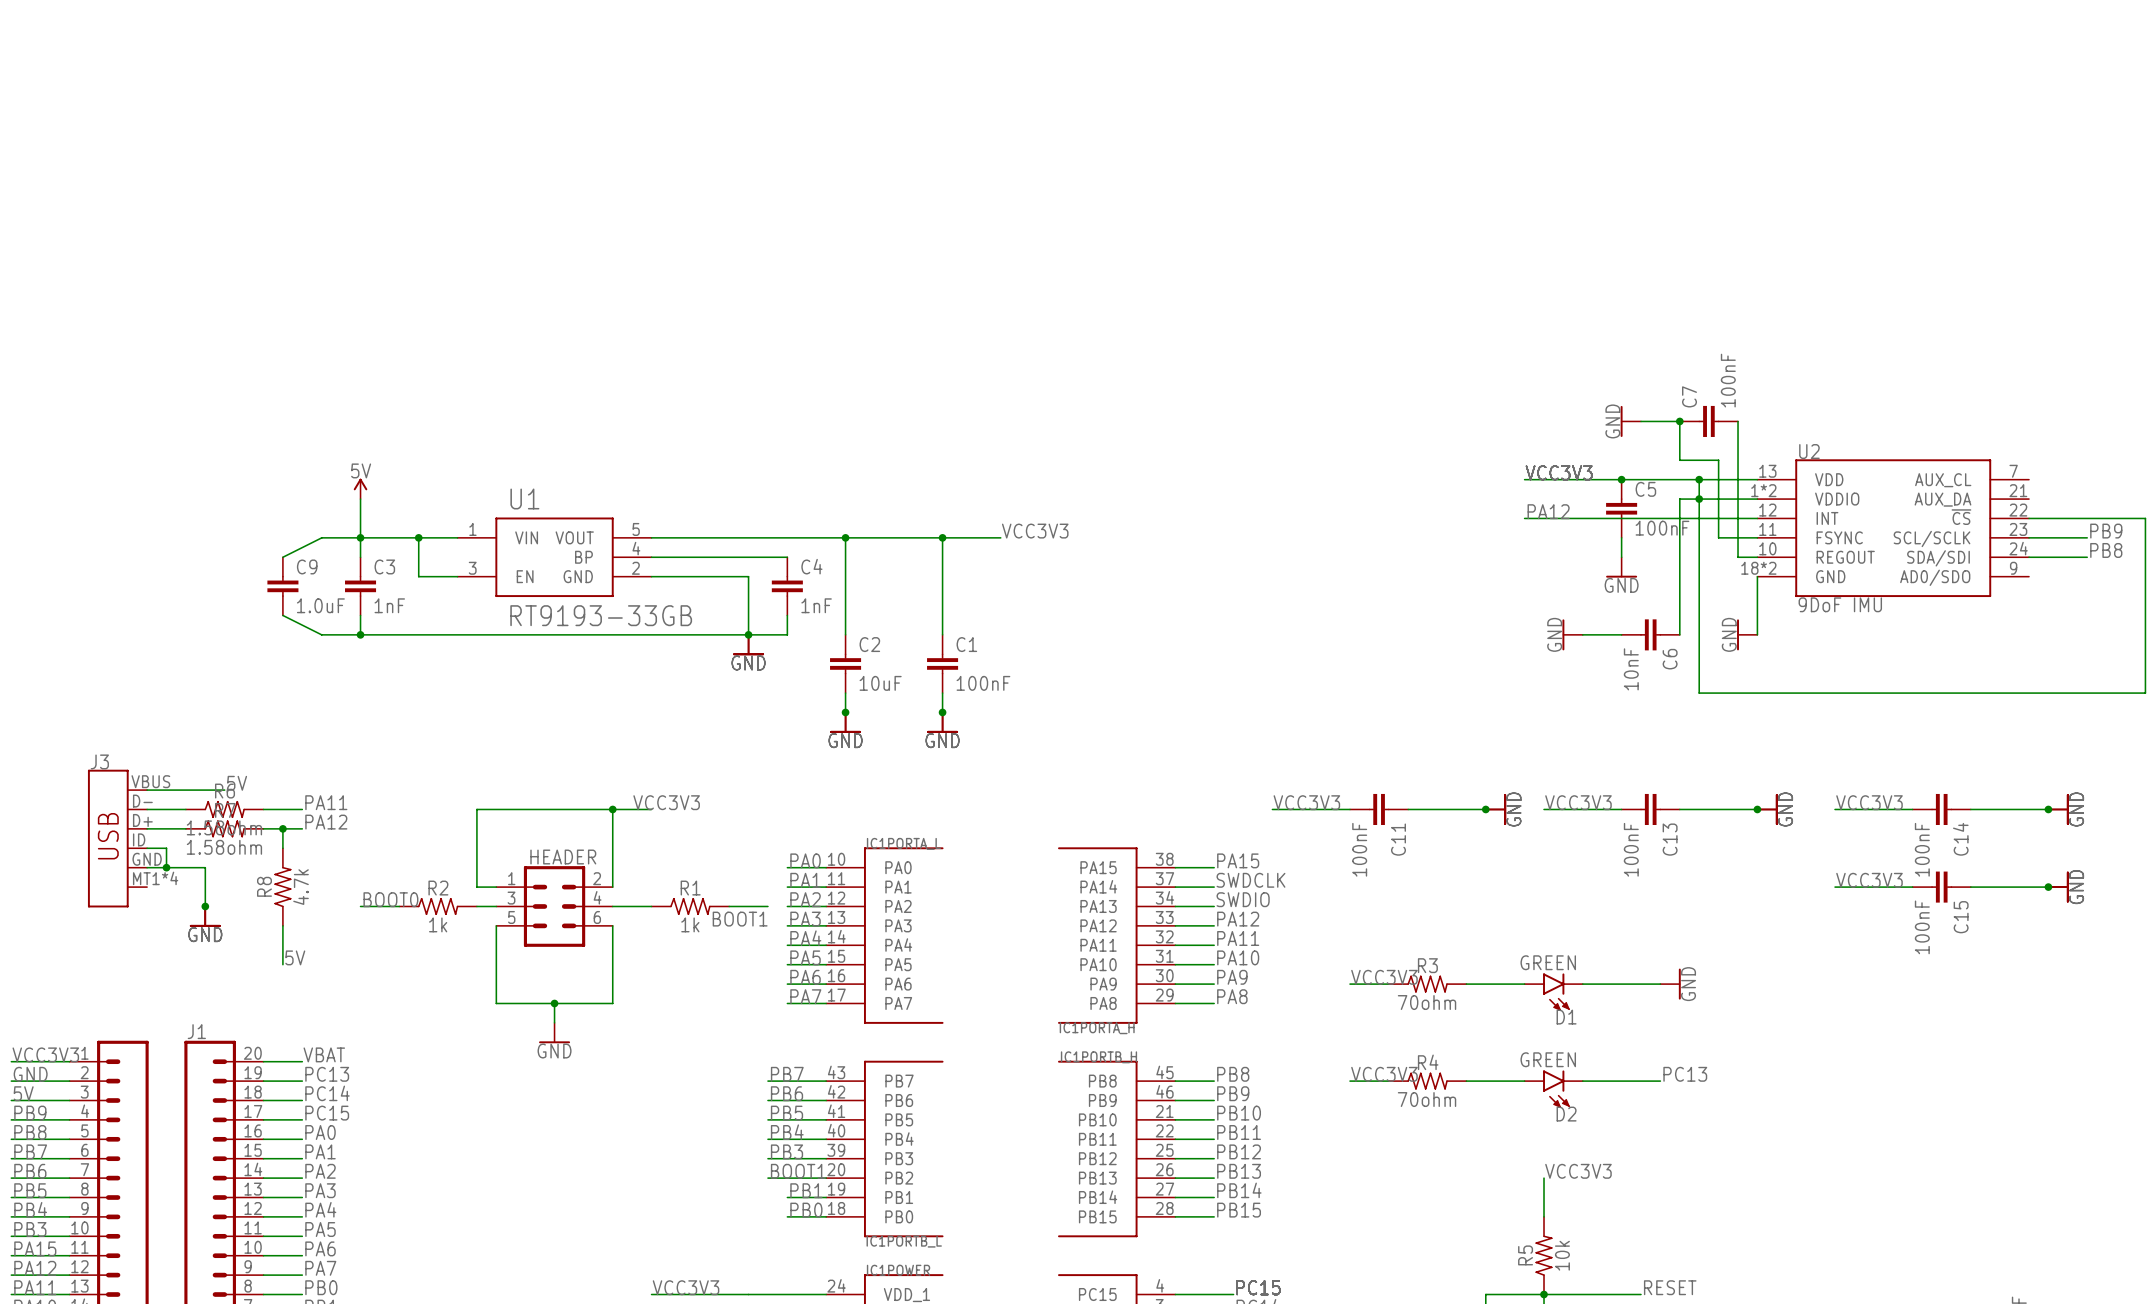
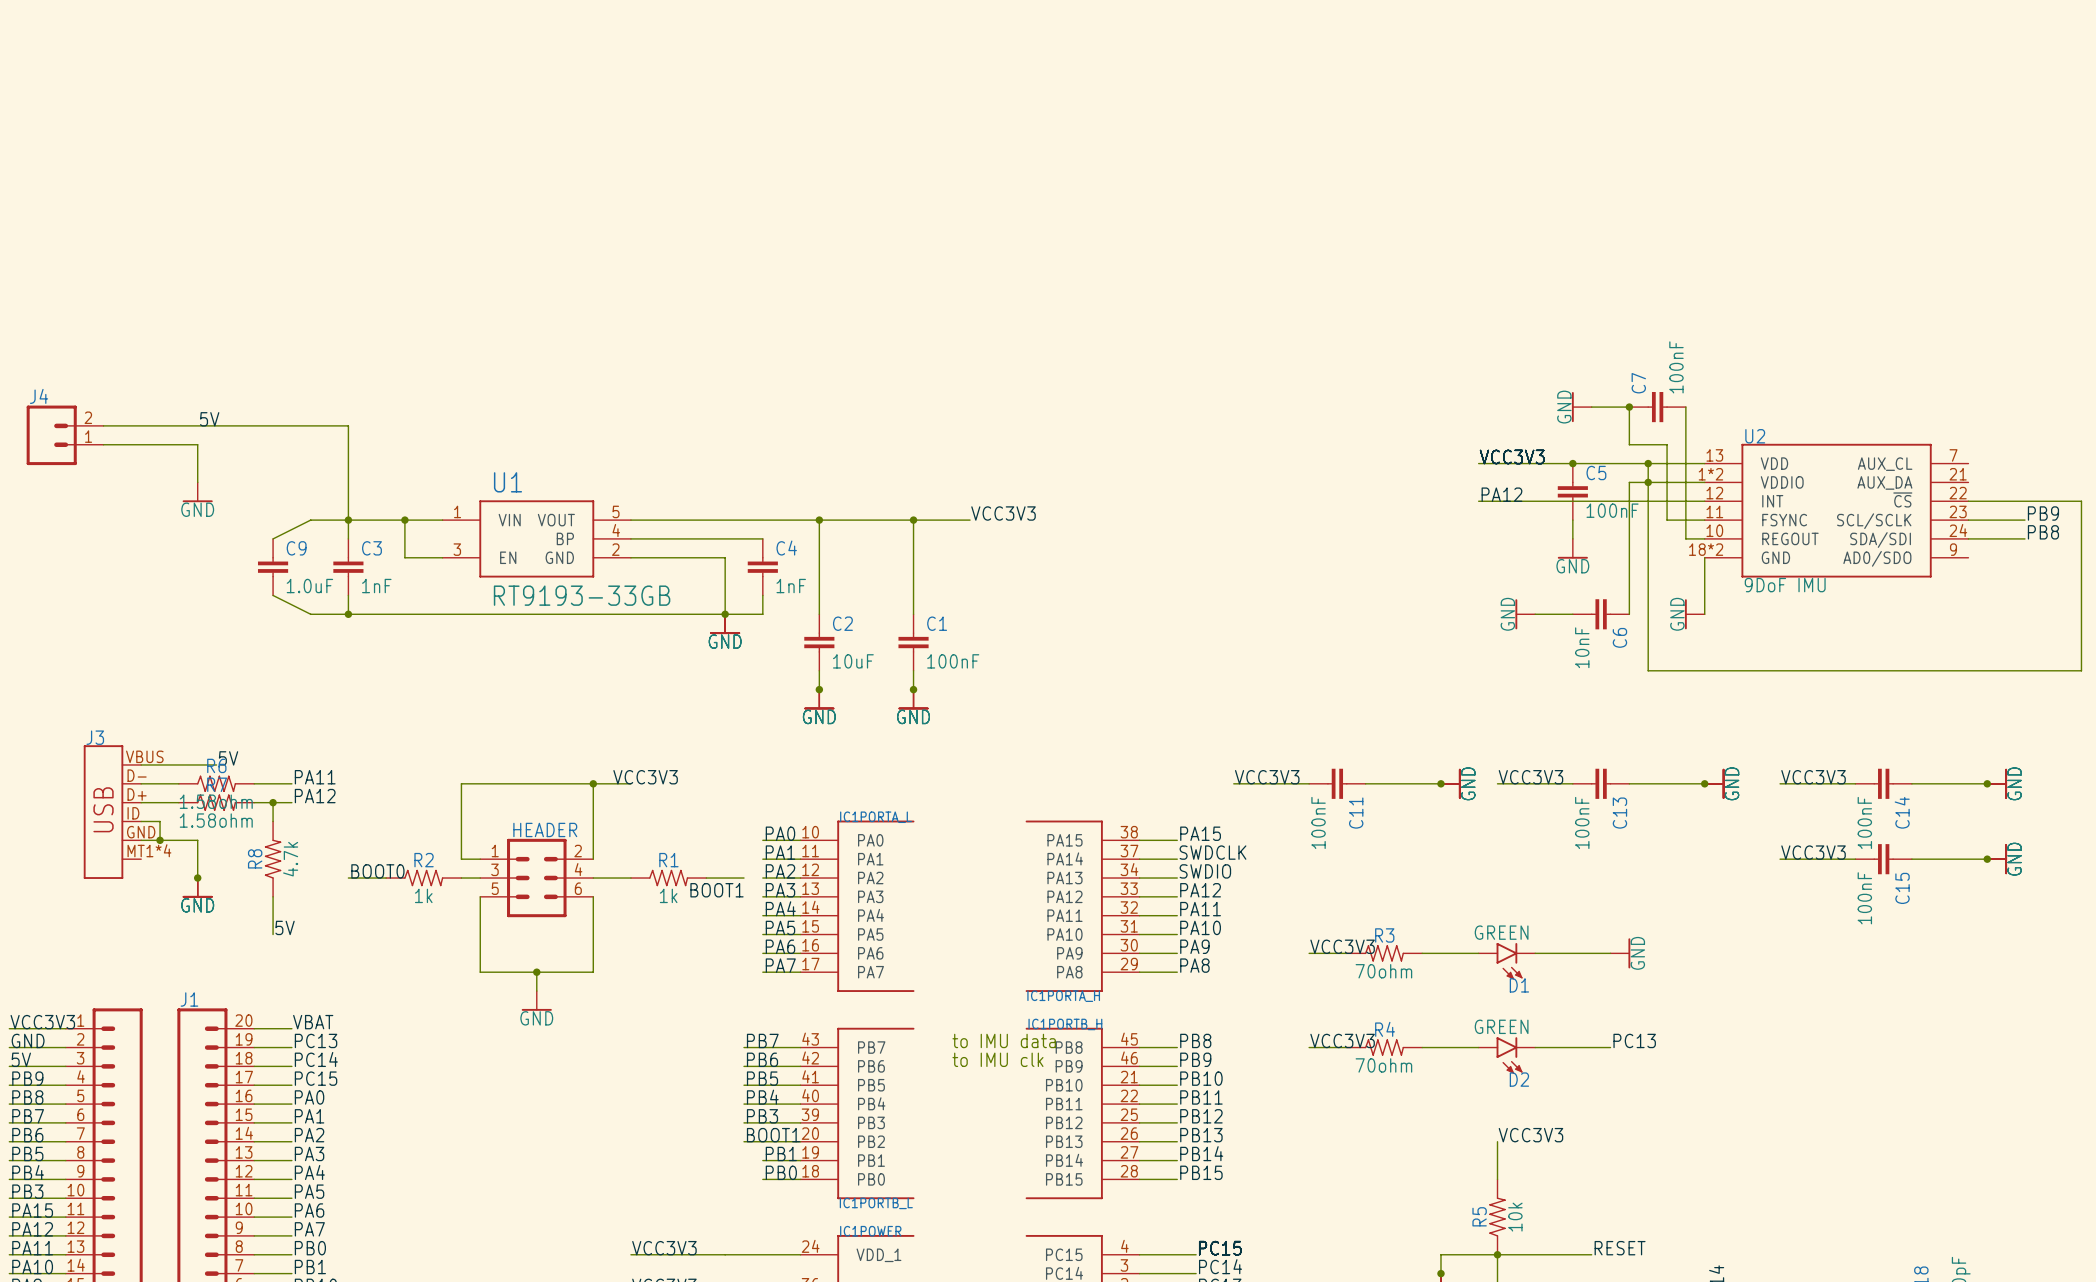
label: none -> 5V (209, 419)
wire: none -> (103, 425) (348, 425) (348, 482)
J4: none -> (65, 435)
wire: none -> (103, 444) (197, 444) (197, 482)
power symbol: 5V (360, 488) -> none
power symbol: none -> GND (197, 492)
text: none -> to IMU data (1004, 1040)
text: none -> to IMU clk (997, 1059)

